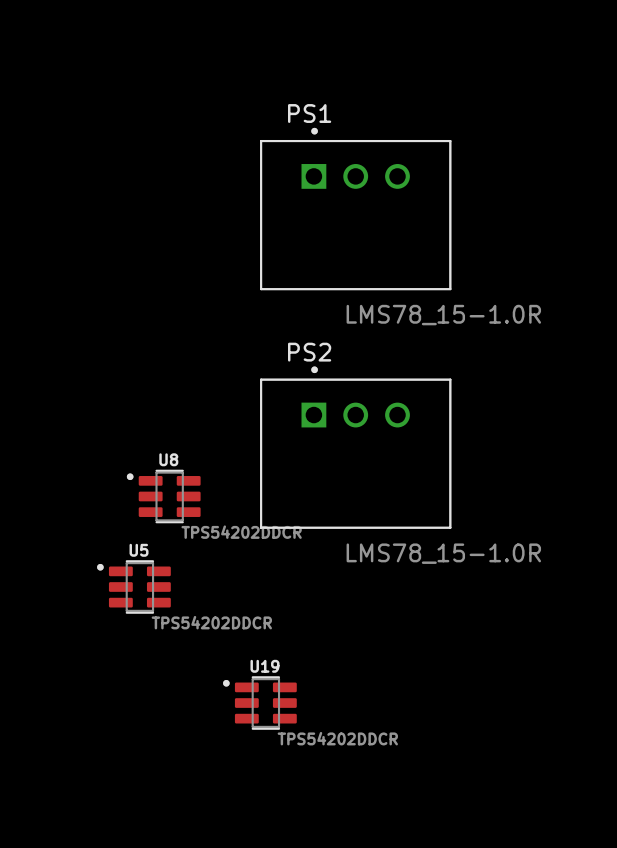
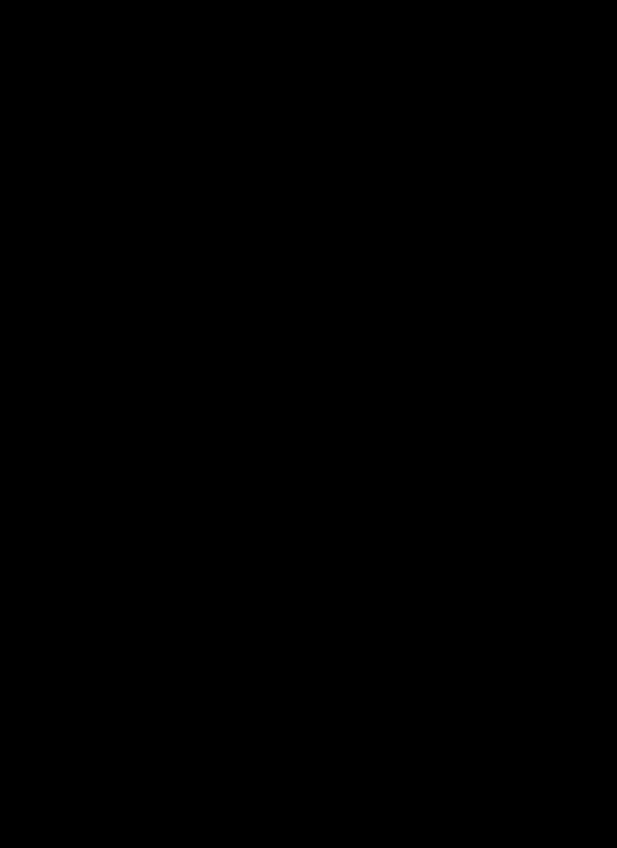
PS1: LMS78_15-1.0R (355, 209) -> none
PS2: LMS78_15-1.0R (355, 447) -> none
U8: TPS54202DDCR (163, 496) -> none
U5: TPS54202DDCR (133, 587) -> none
U19: TPS54202DDCR (259, 703) -> none

